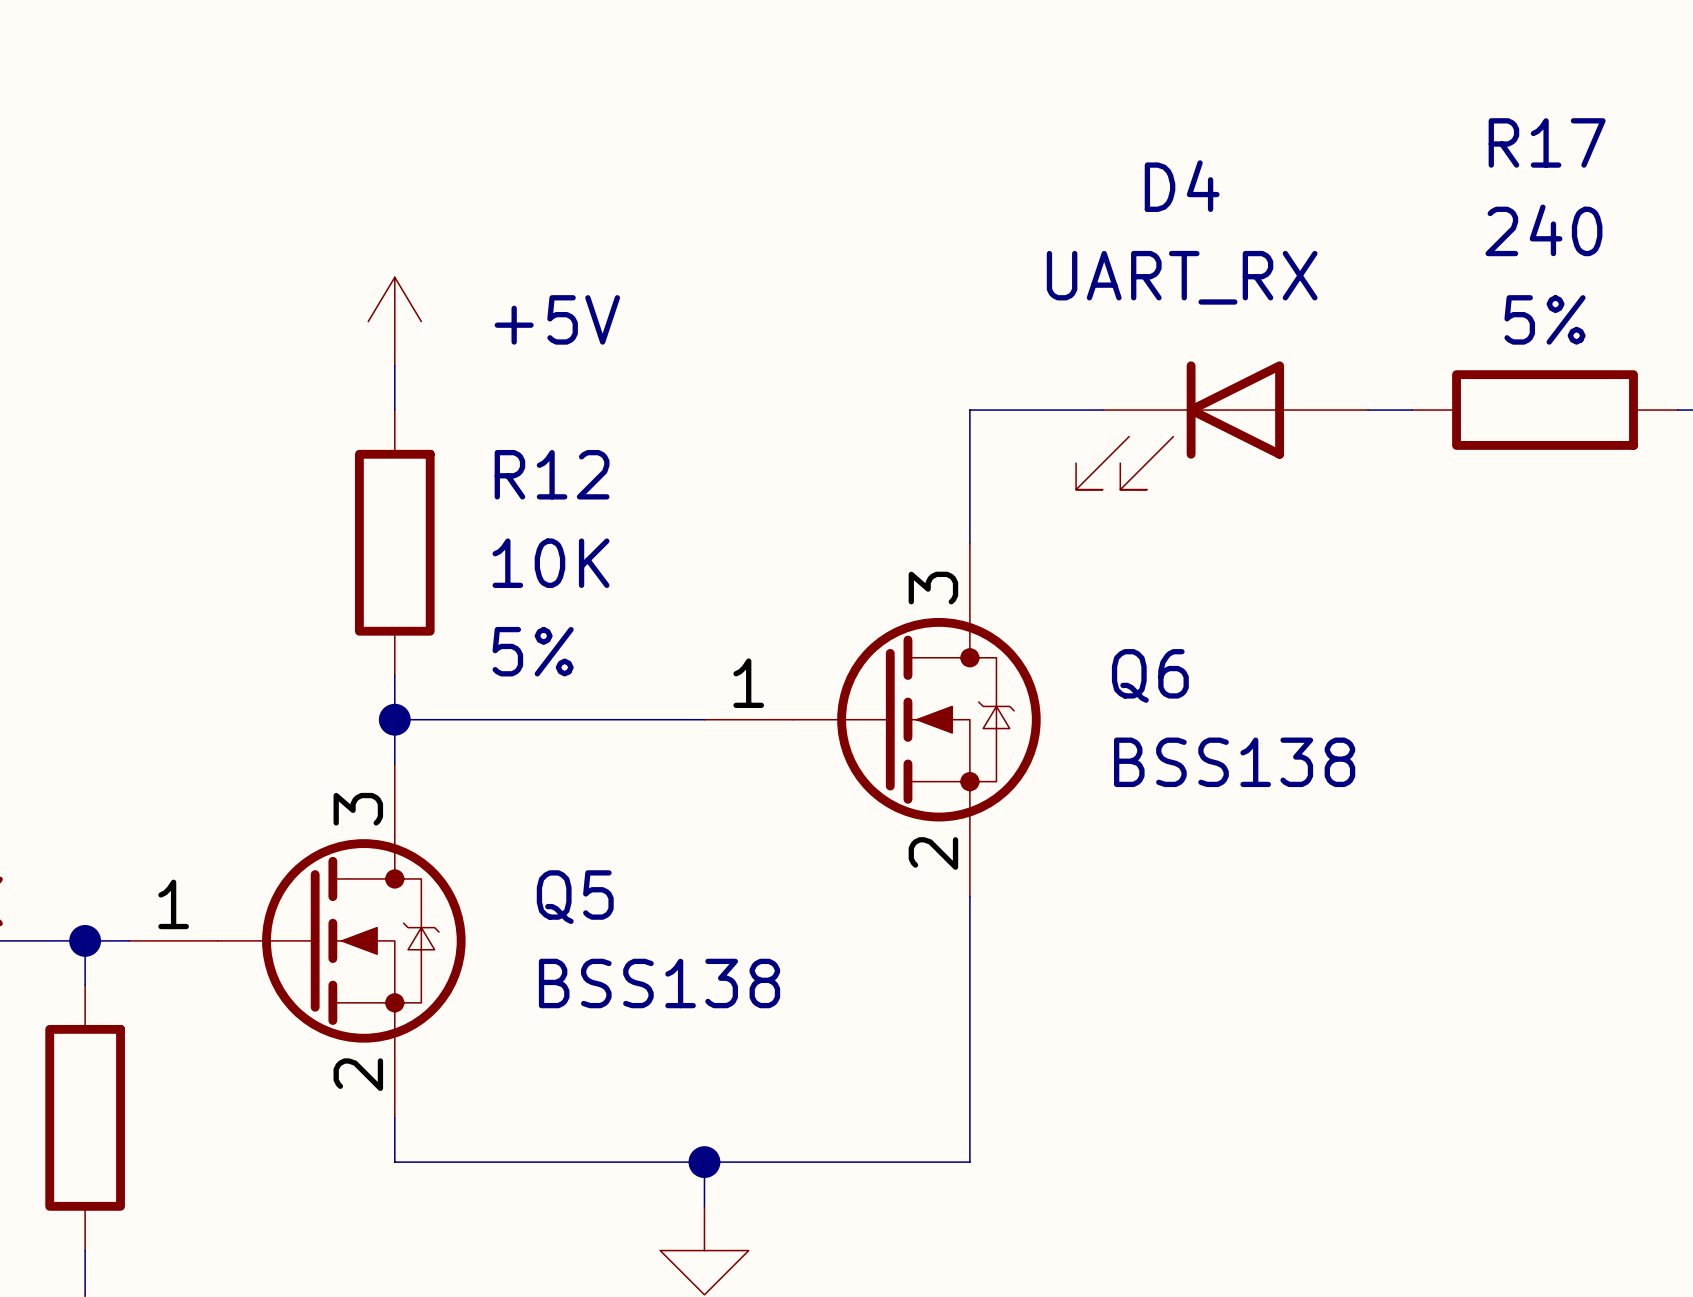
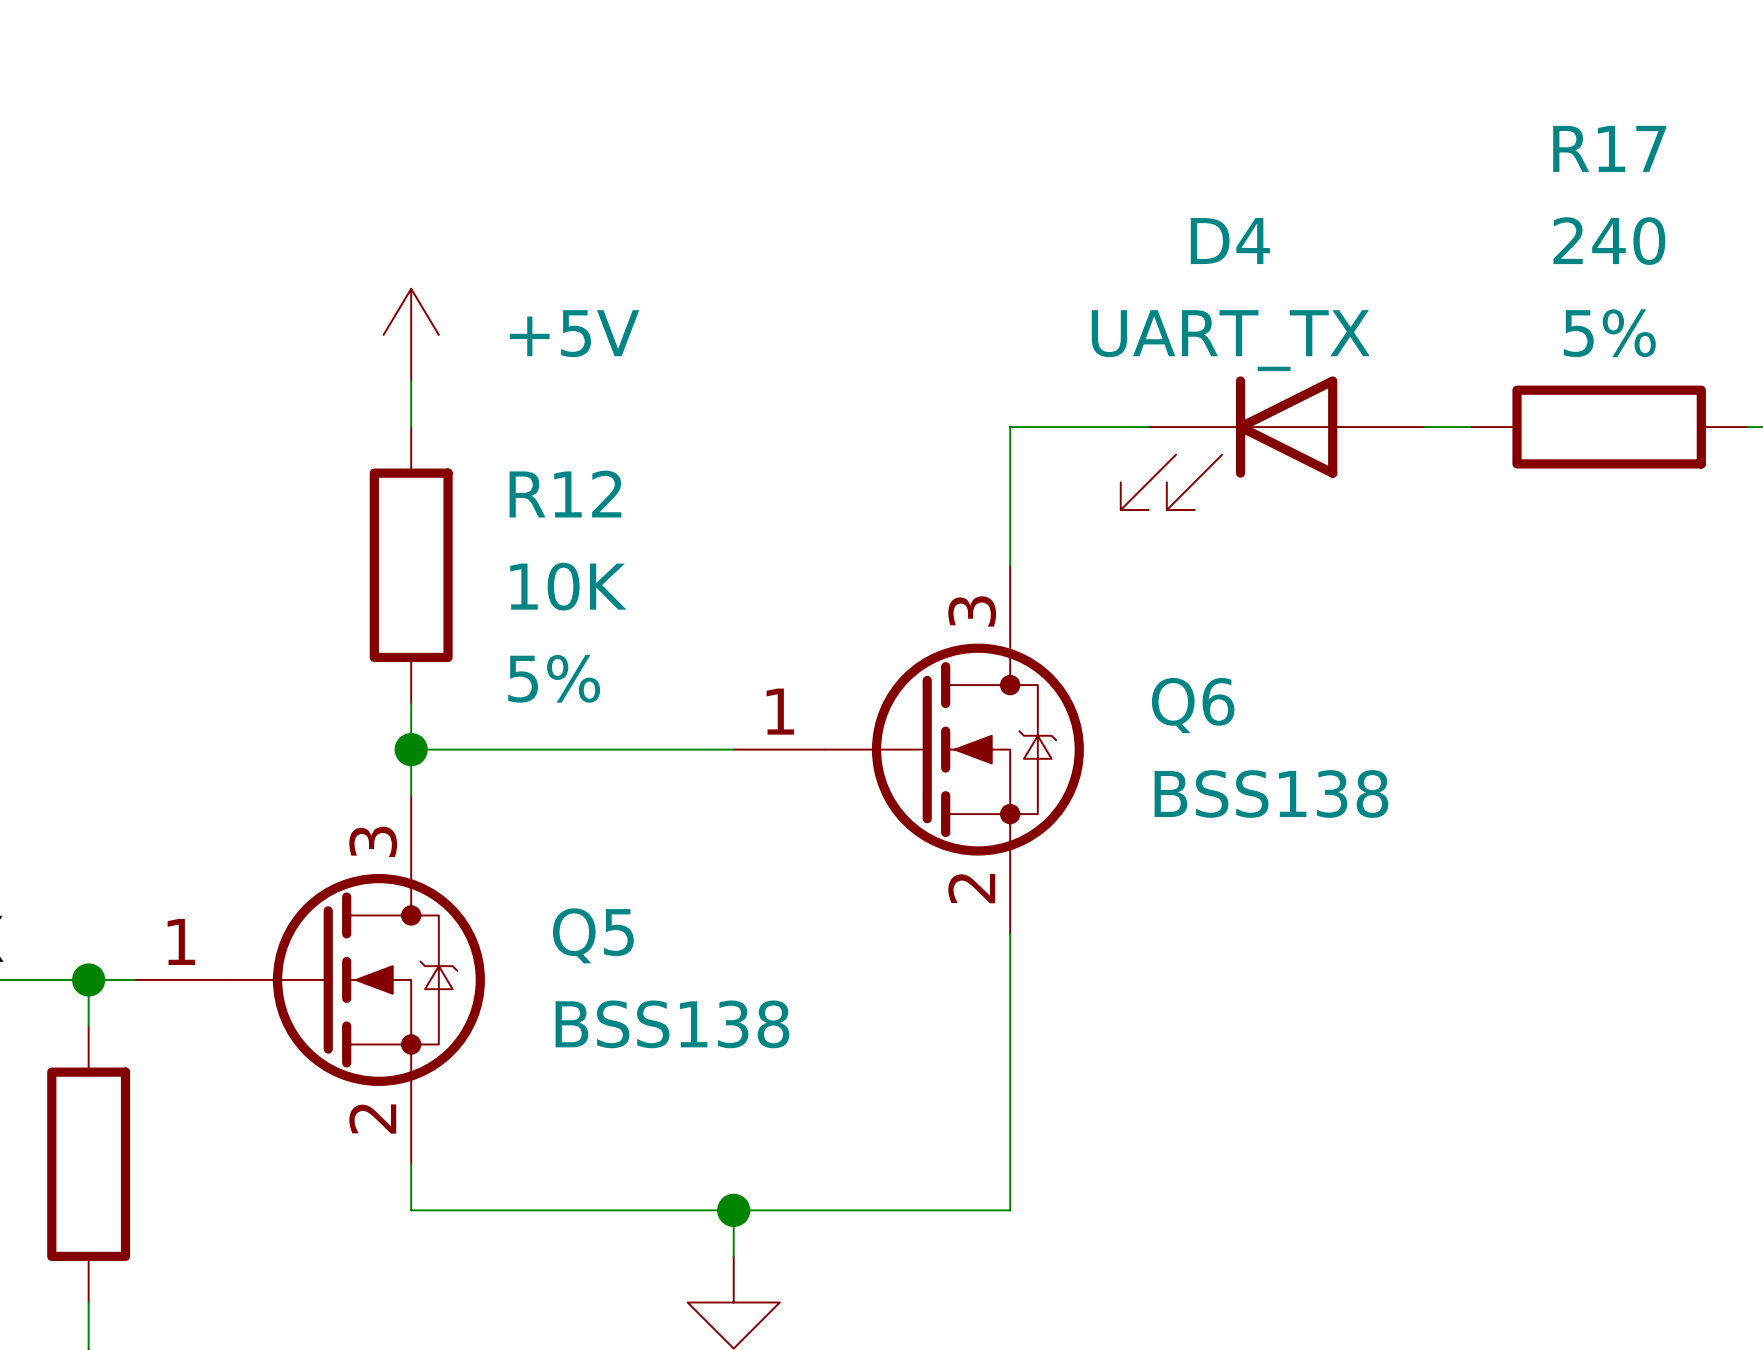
D4 name position: D4 (1182, 186) -> D4 (1230, 241)
D4 value: UART_RX (1182, 277) -> UART_TX (1230, 340)

